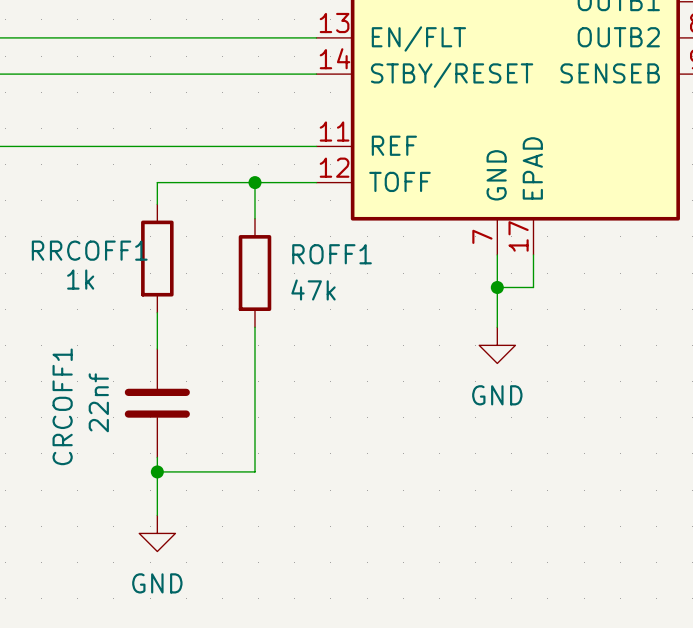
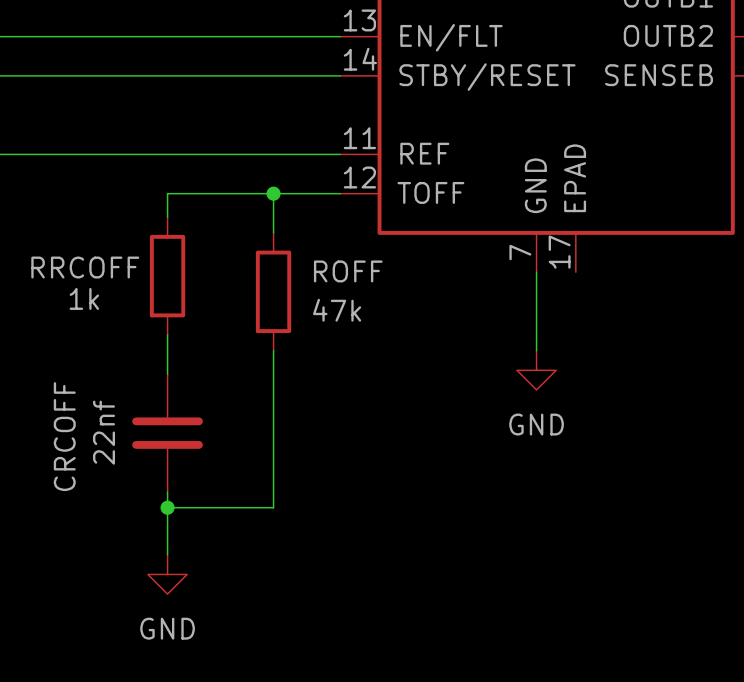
RRCOFF1 name: RRCOFF1 (89, 250) -> RRCOFF (85, 267)
ROFF1 name: ROFF1 (332, 254) -> ROFF (348, 271)
wire: (533, 254) (533, 287) (497, 287) -> none
junction: (497, 287) -> none
CRCOFF1 name: CRCOFF1 (62, 406) -> CRCOFF (64, 436)

